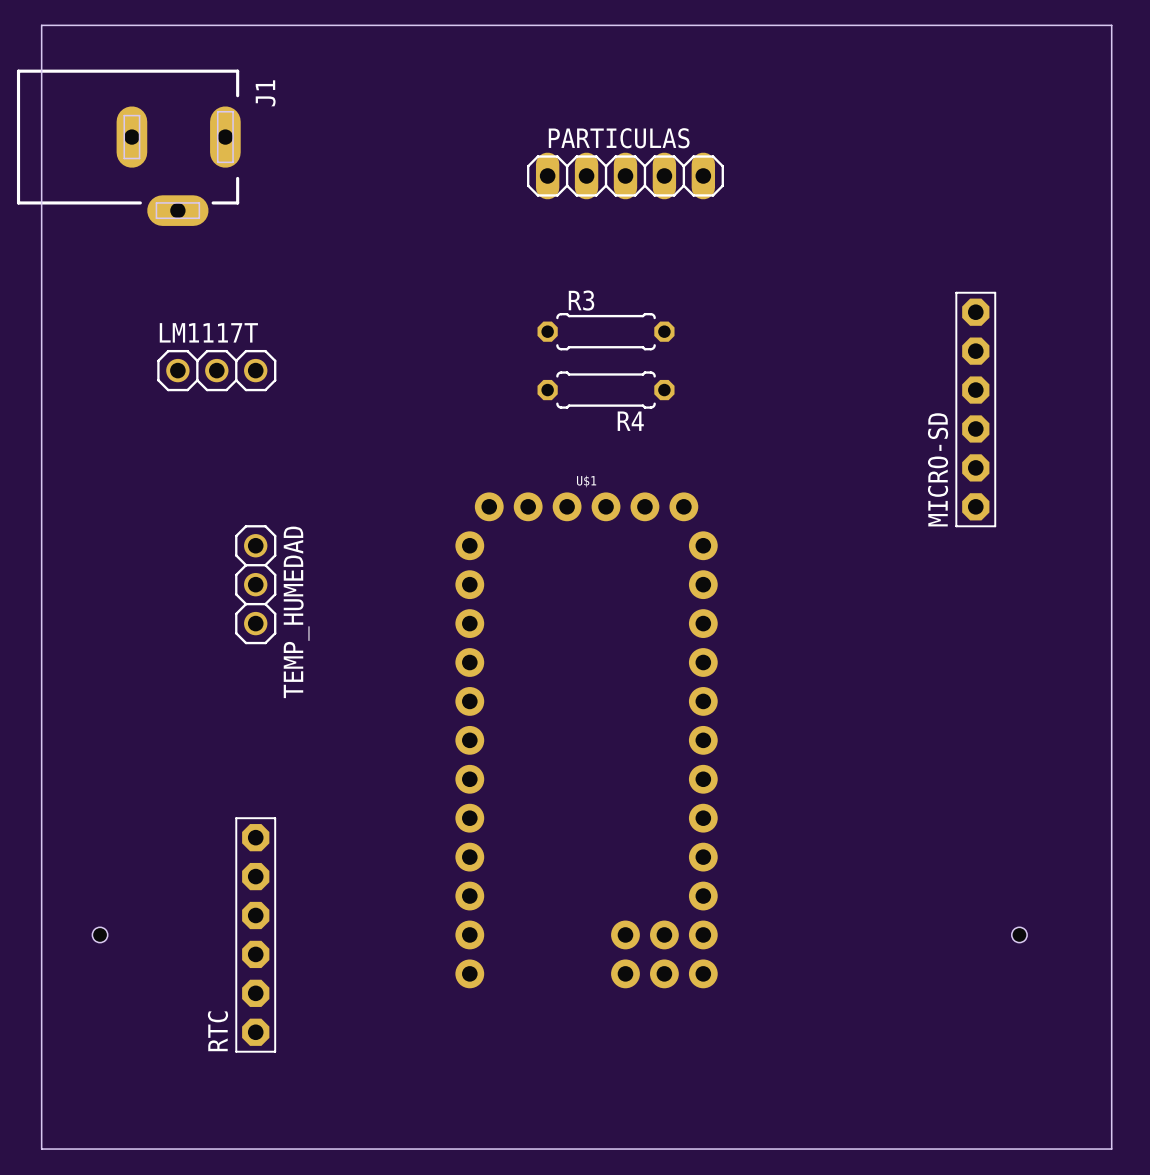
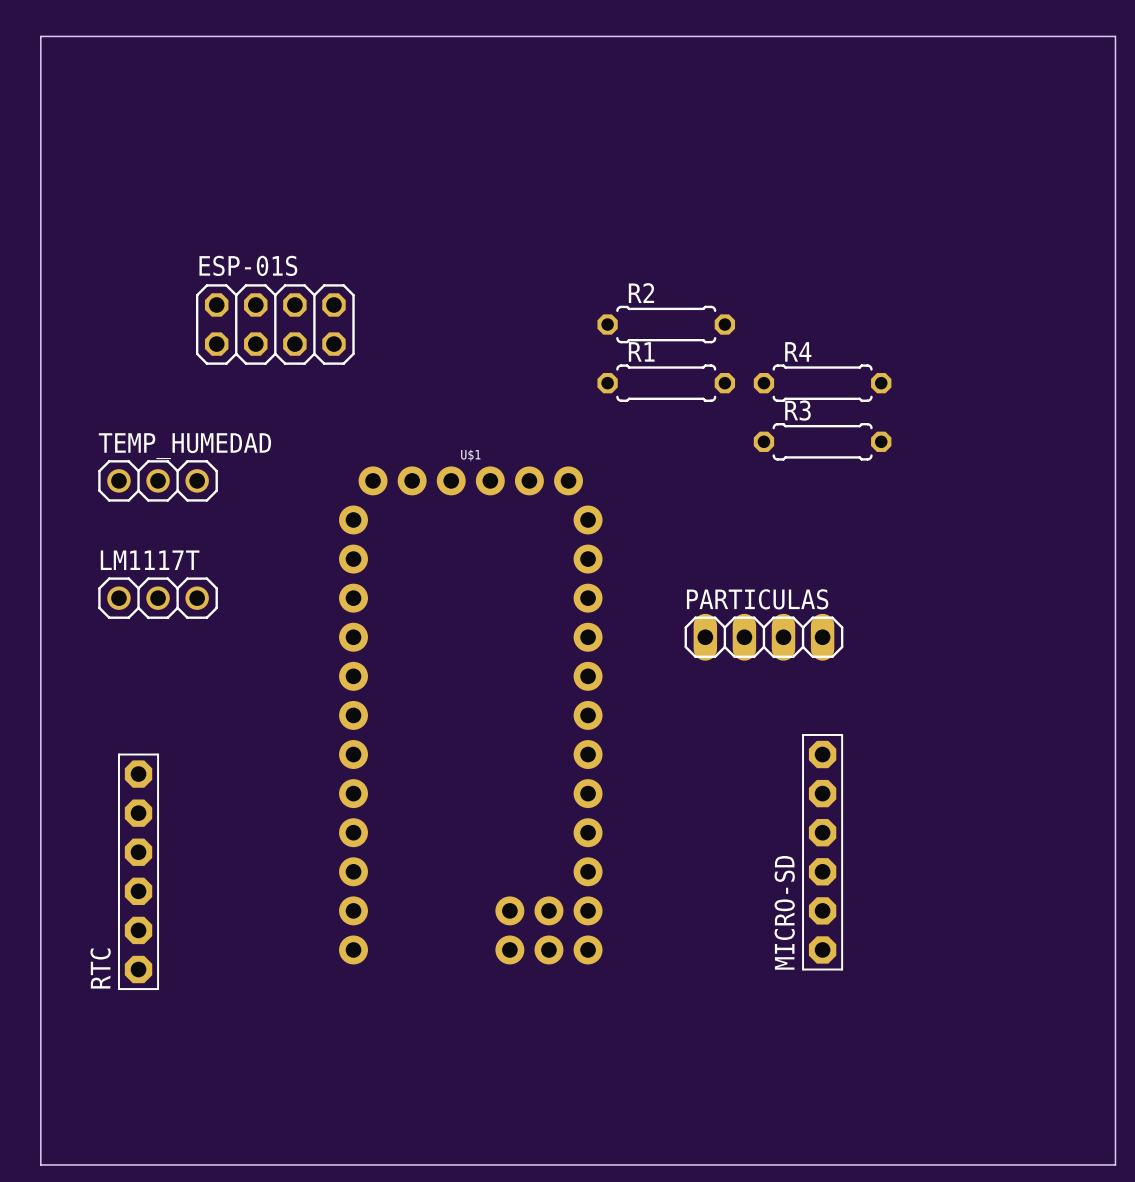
J1: (128, 147) -> none
PARTICULAS: (625, 175) -> none
ESP-01S: none -> (275, 324)
R2: none -> (666, 324)
R3 position: (606, 331) -> (822, 441)
LM1117T position: (216, 370) -> (158, 598)
R1: none -> (666, 383)
R4 position: (606, 390) -> (822, 383)
MICRO-SD: (975, 409) -> none
R4 name position: R4 (630, 421) -> R4 (798, 351)
TEMP_HUMEDAD rotation: 0° (255, 584) -> 90° clockwise (158, 480)
TEMP_HUMEDAD position: (255, 584) -> (158, 480)
TEMP_HUMEDAD name position: TEMP_HUMEDAD (296, 612) -> TEMP_HUMEDAD (184, 446)
PARTICULAS: none -> (763, 637)
U$1 position: (586, 740) -> (470, 715)
MICRO-SD: none -> (822, 852)
hole: (100, 934) -> none
RTC position: (255, 934) -> (138, 871)
hole: (1019, 934) -> none

